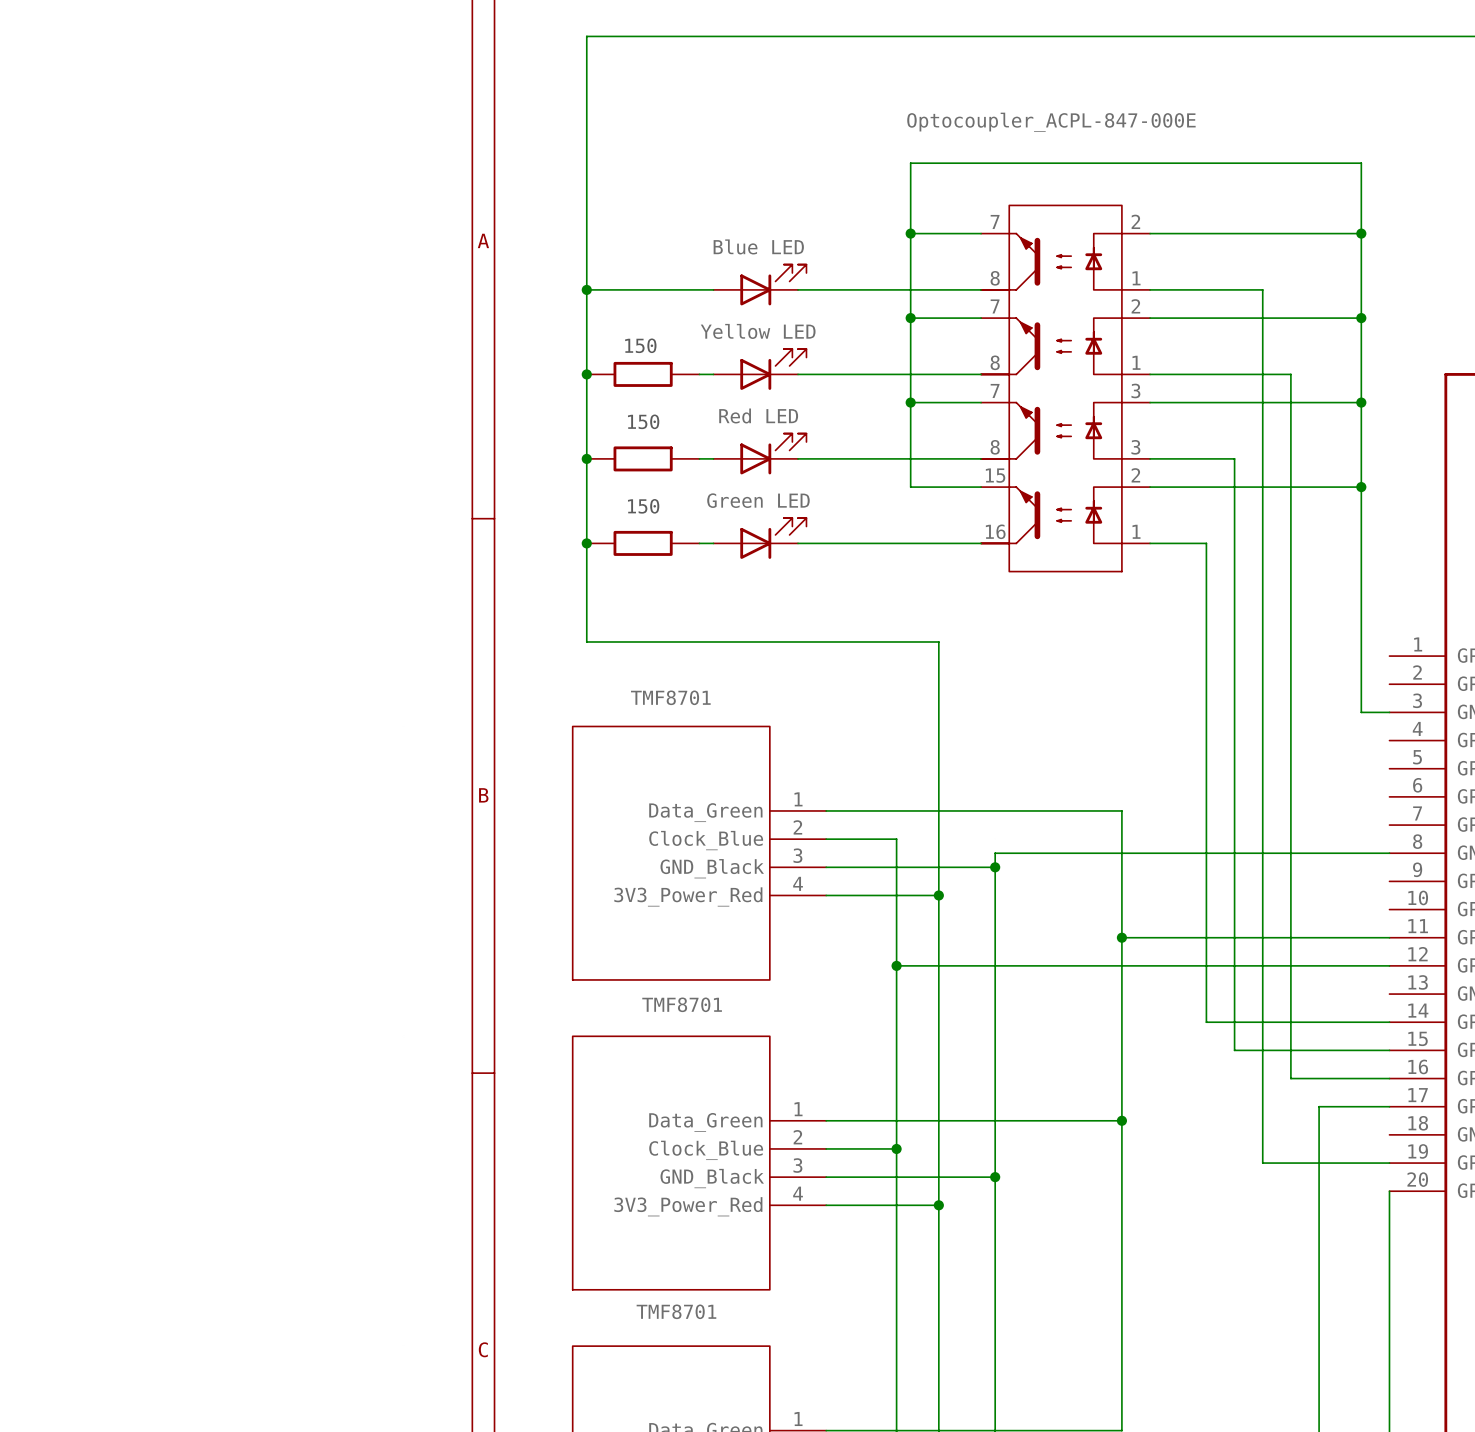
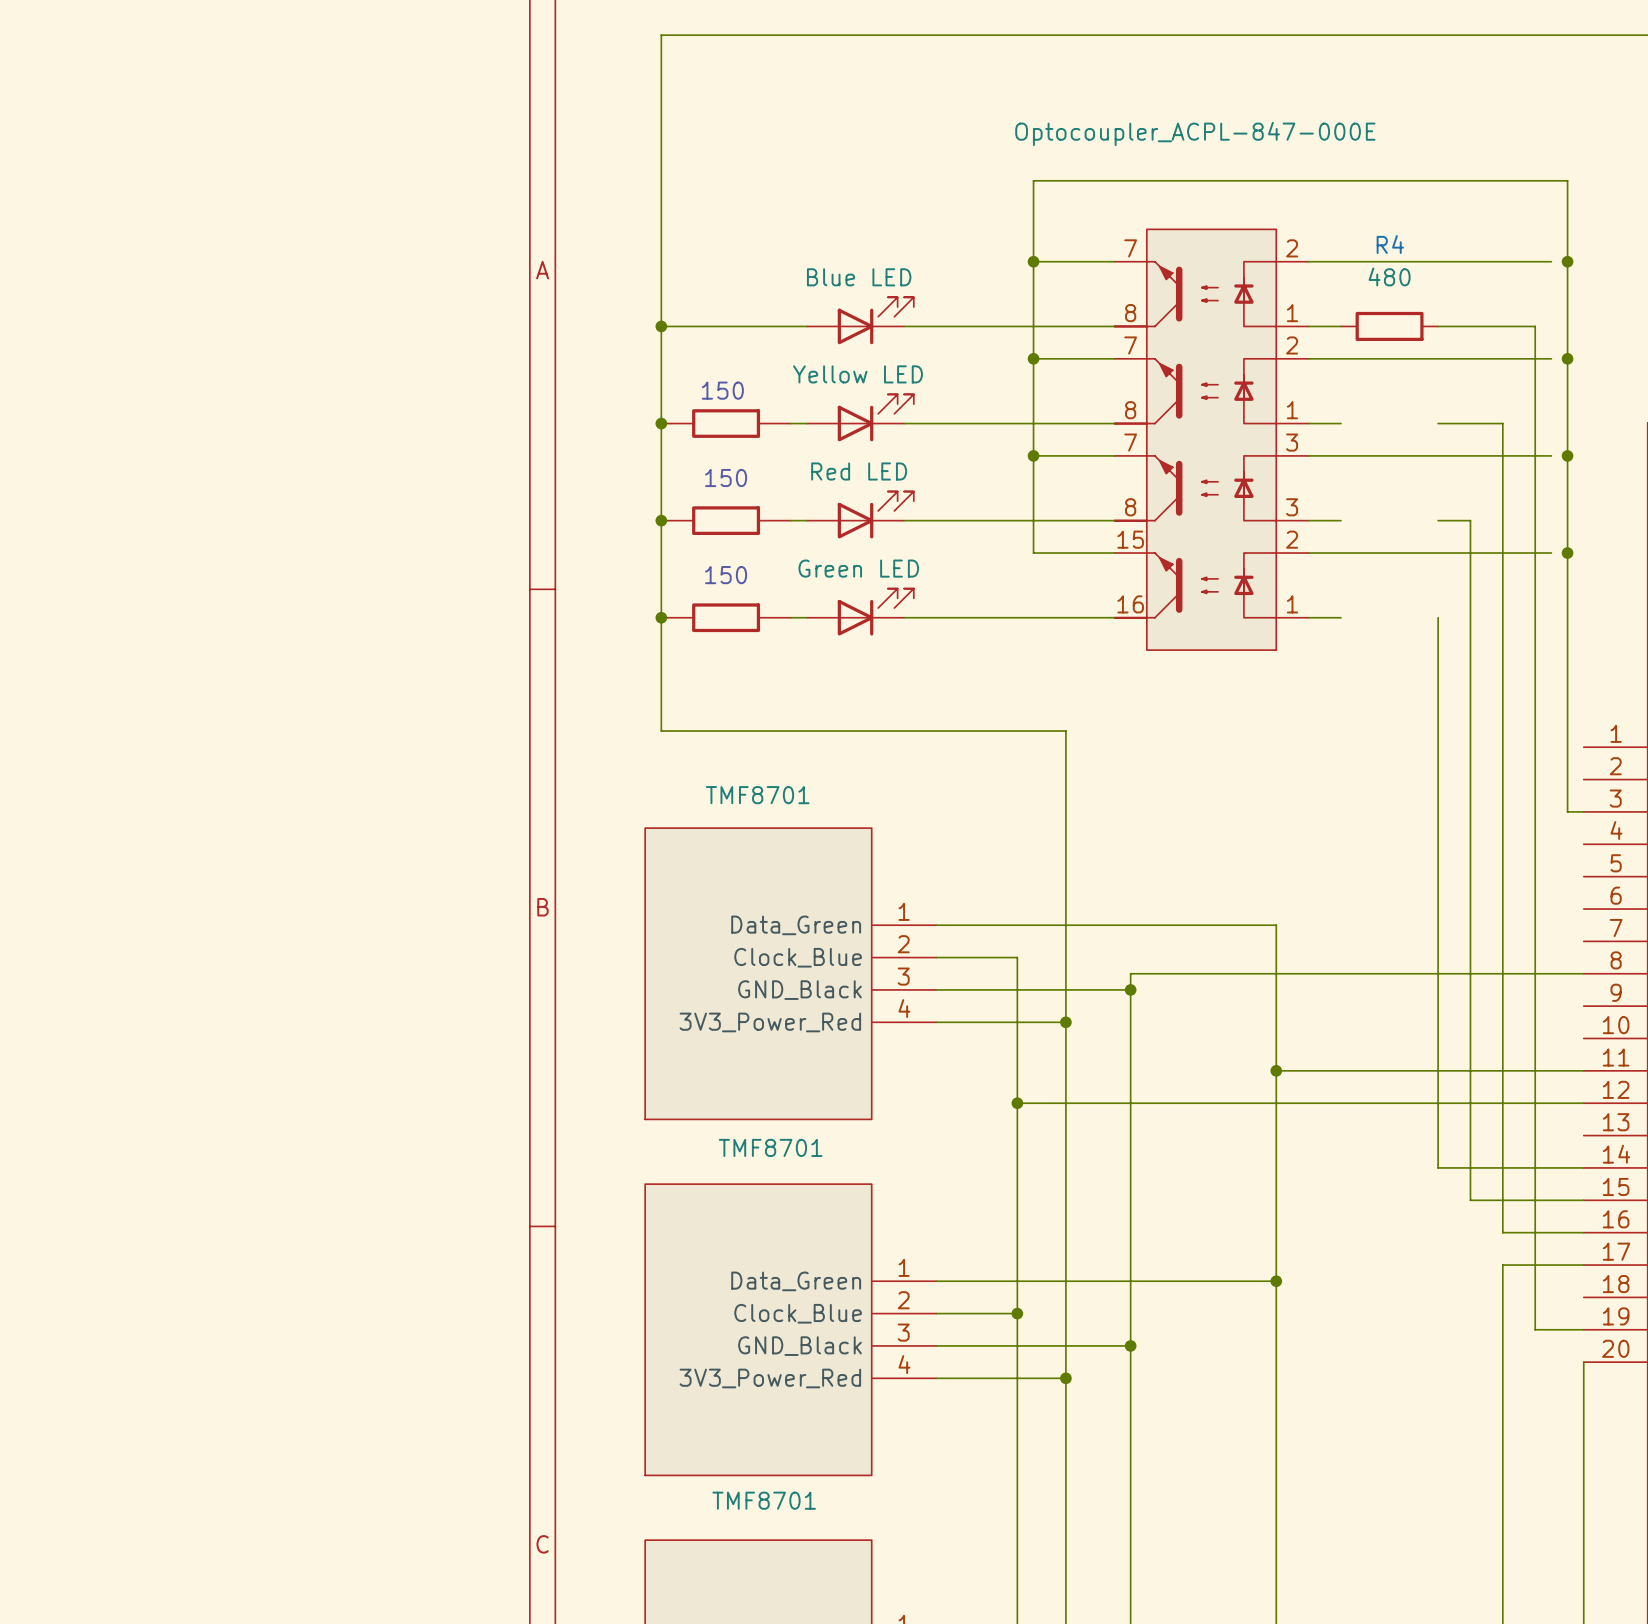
wire: (1361, 163) (1361, 712) (1375, 712) -> (1551, 180) (1567, 180) (1567, 811)
junction position: (1361, 233) -> (1567, 261)
wire: (1178, 289) (1262, 289) (1262, 543) -> none
R4: none -> 480 (1389, 326)
junction position: (1361, 318) -> (1567, 358)
wire: (1178, 374) (1262, 374) -> none
wire: (1290, 374) (1290, 458) -> (1438, 520) (1470, 520)
junction position: (1361, 402) -> (1567, 455)
wire: (1178, 458) (1234, 458) (1234, 1050) (1290, 1050) (1290, 1078) (1319, 1078) -> (1470, 423) (1502, 423) (1502, 1232)
junction position: (1361, 487) -> (1567, 553)
wire: (1178, 543) (1206, 543) (1206, 1022) (1262, 1022) (1262, 1163) (1347, 1163) -> (1438, 326) (1535, 326) (1535, 1329)

